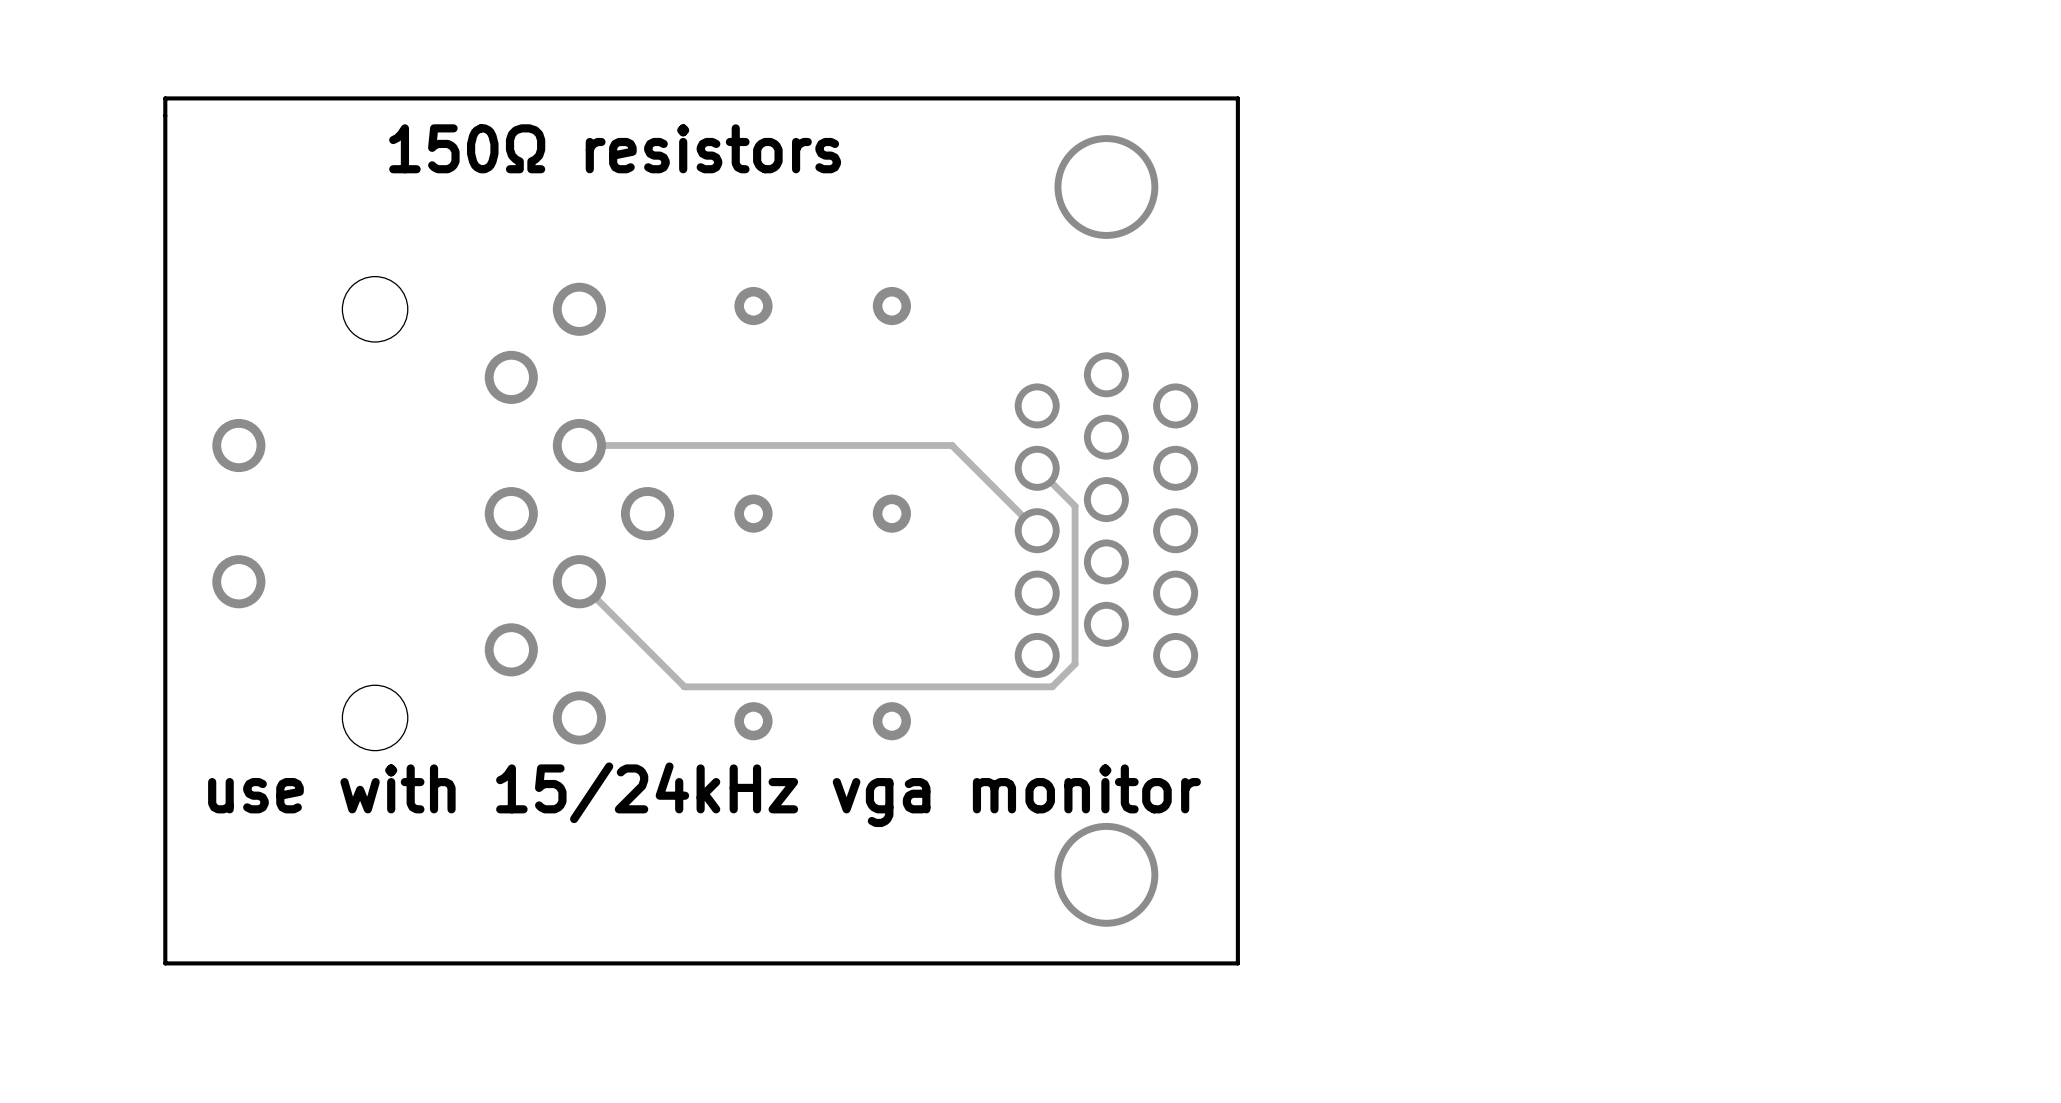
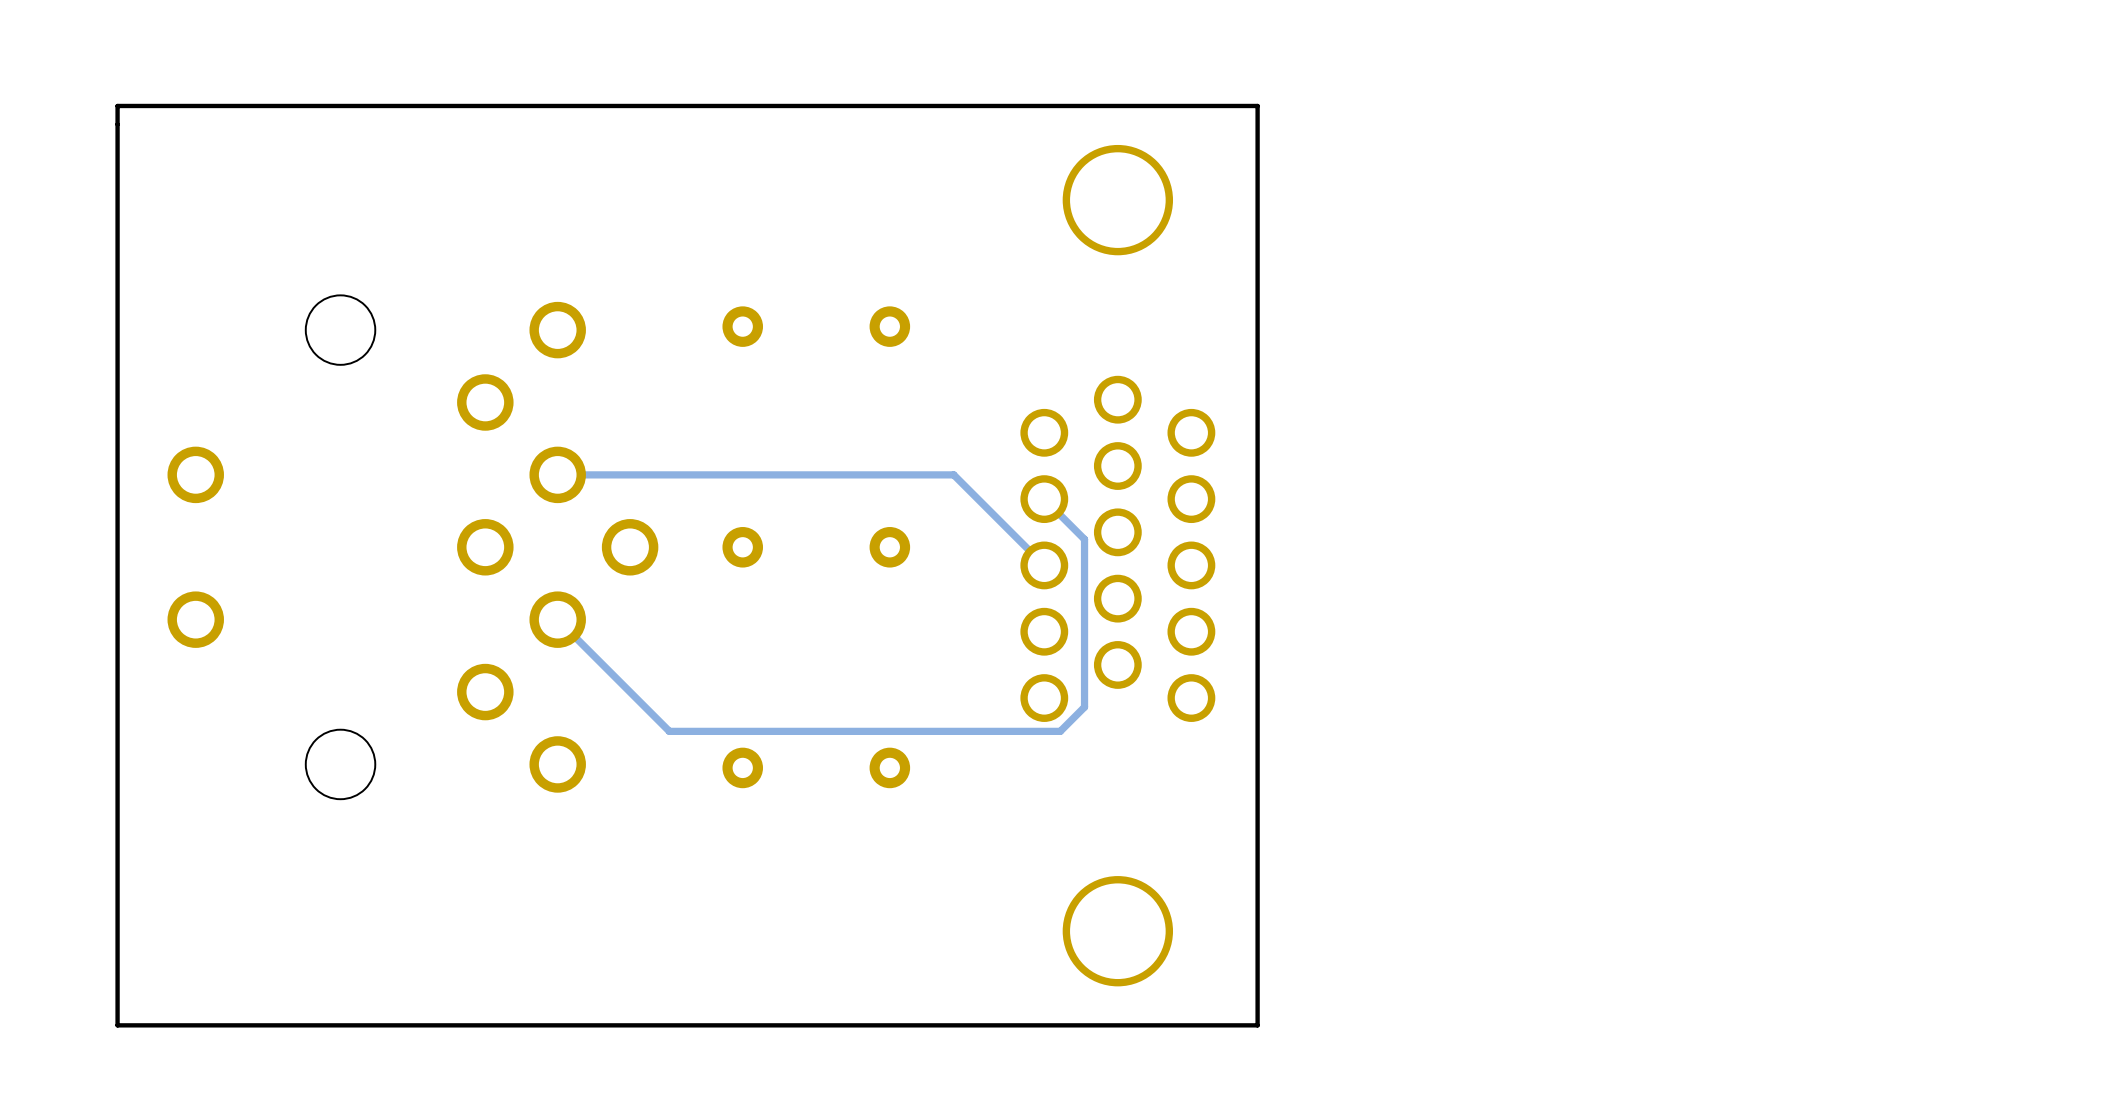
text: 150Ω resistors (615, 148) -> none
text: use with 15/24kHz vga monitor (704, 794) -> none

